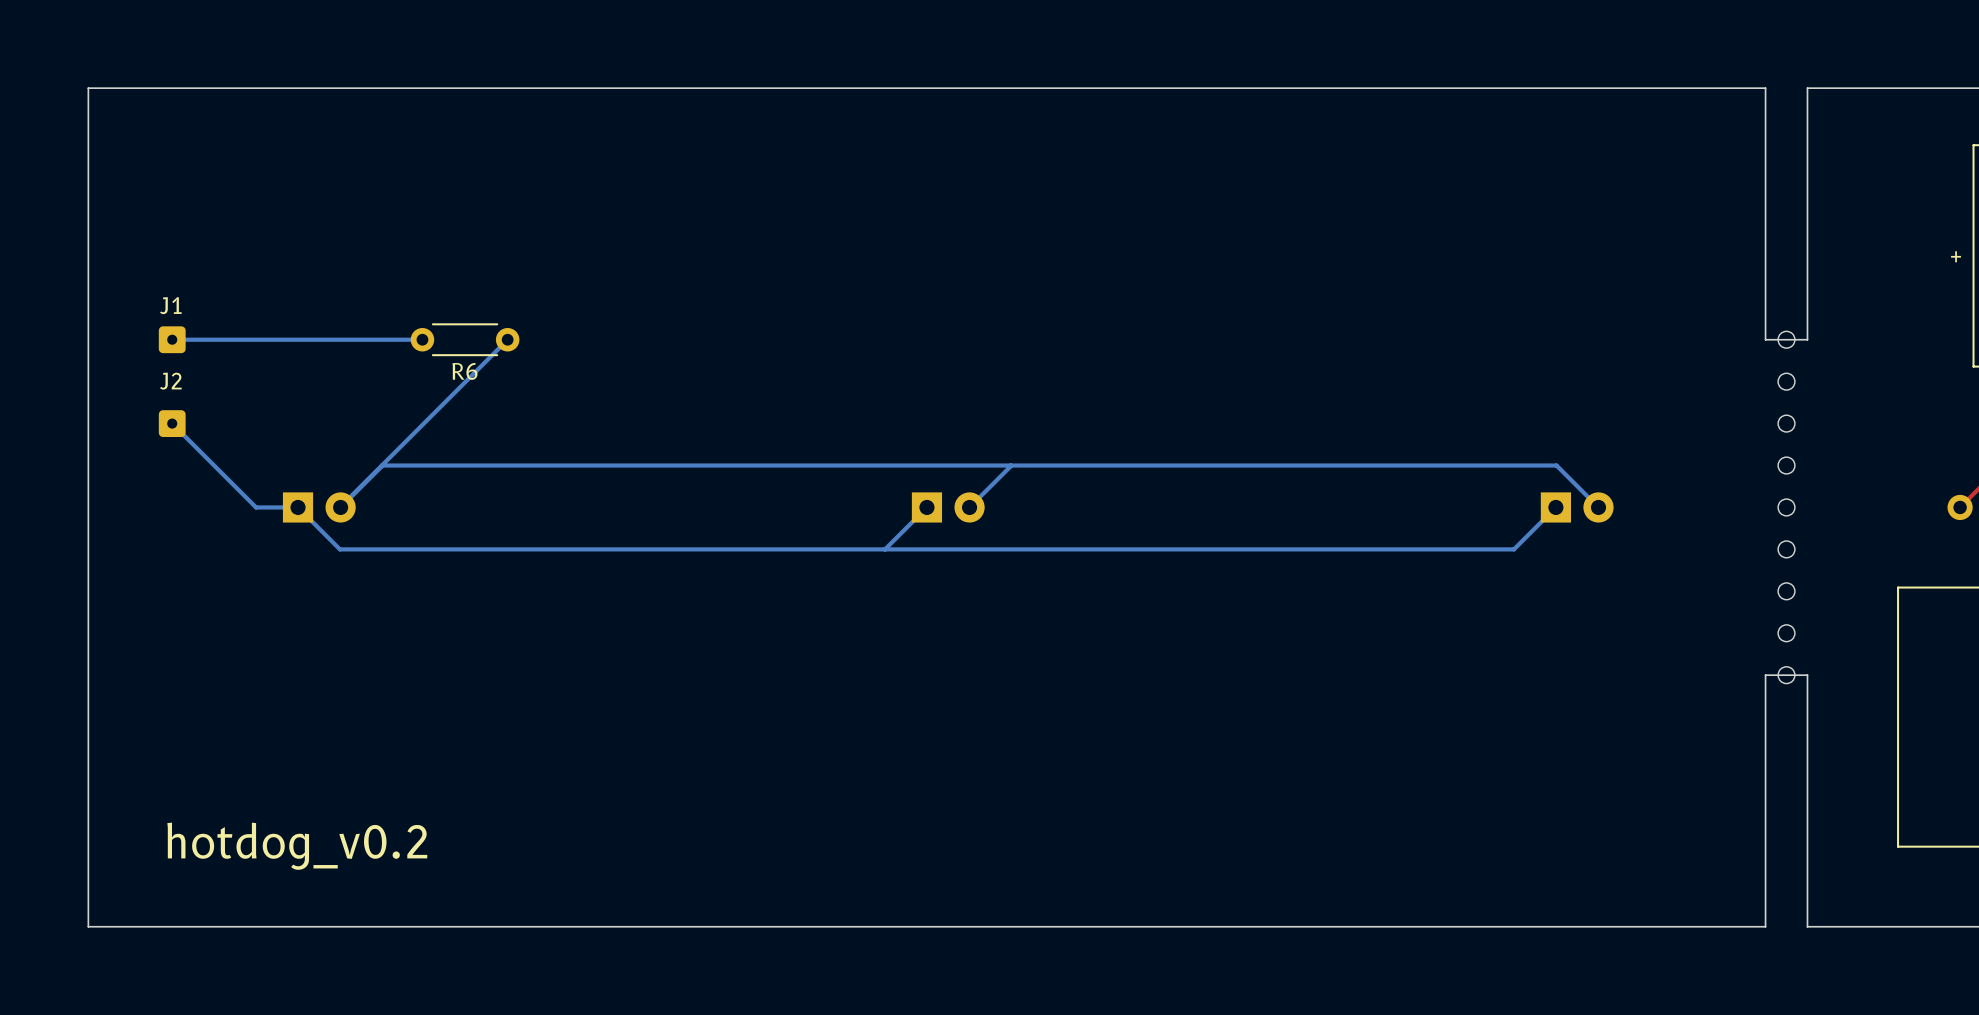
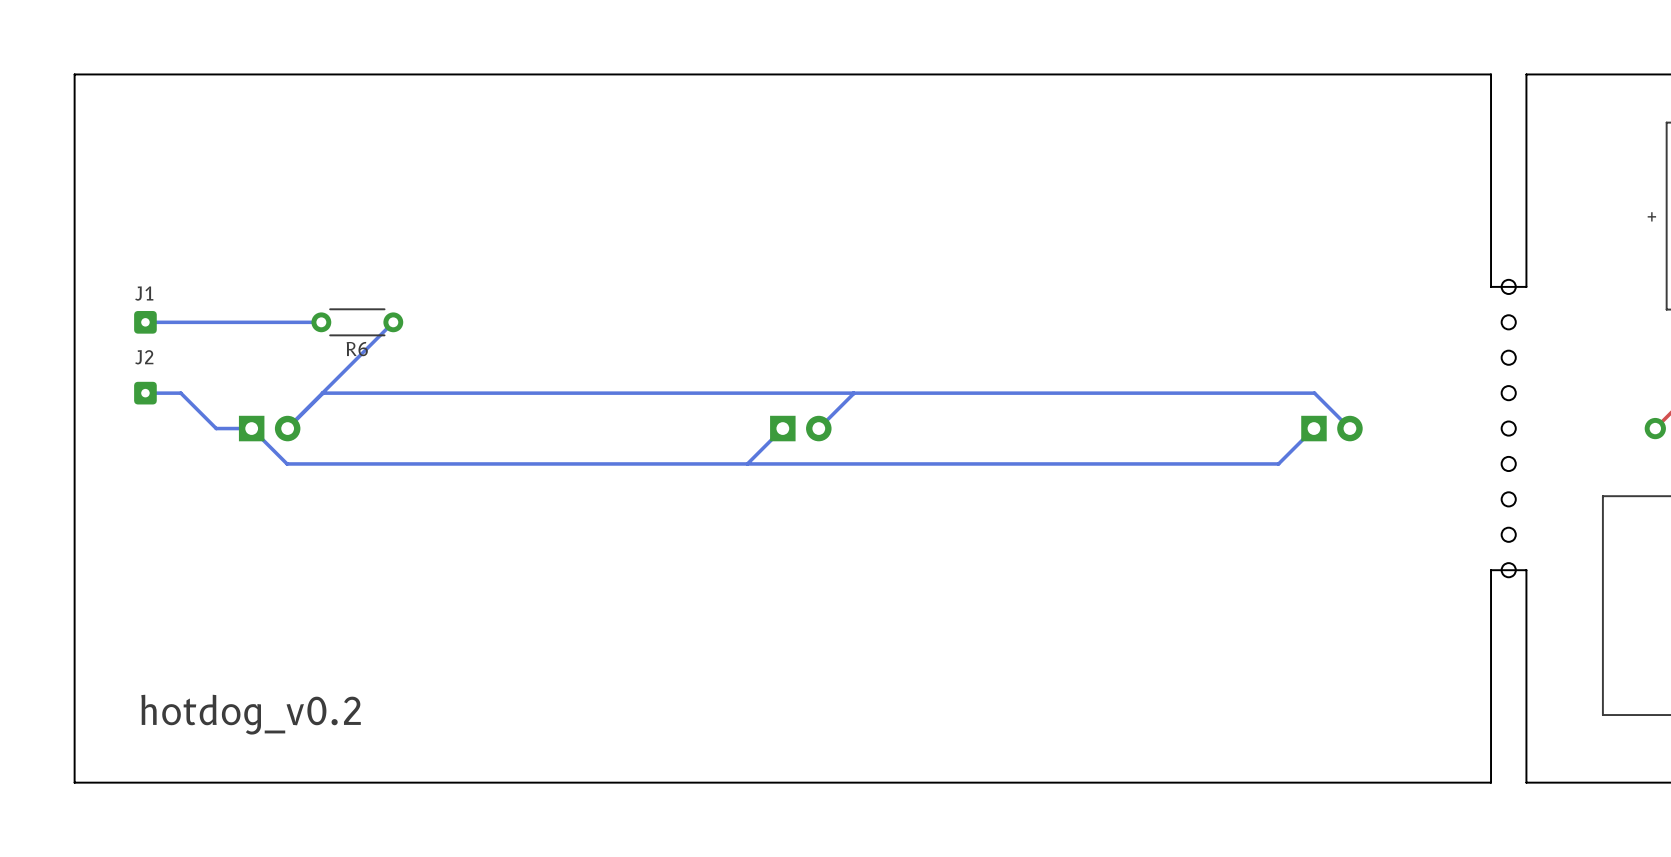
bottom track: (172, 339) (422, 339) -> none
J1 position: (172, 339) -> (145, 322)
R6 position: (465, 339) -> (357, 322)
bottom track: (507, 339) (465, 381) -> none
bottom track: none -> (145, 322) (321, 322)
bottom track: (172, 423) (214, 465) -> (145, 393) (180, 393)
J2 position: (172, 423) -> (145, 393)

